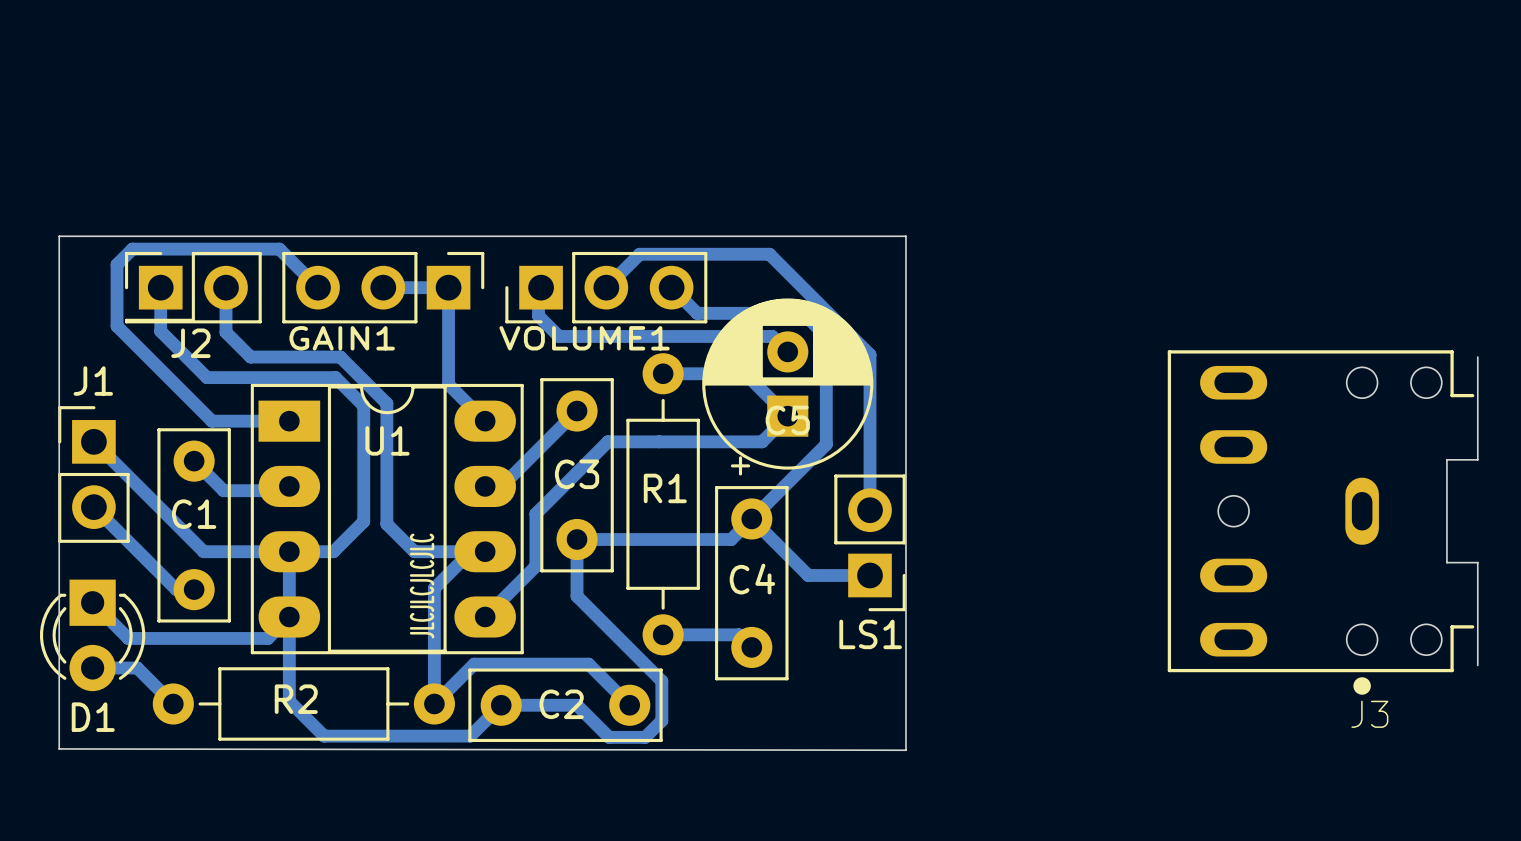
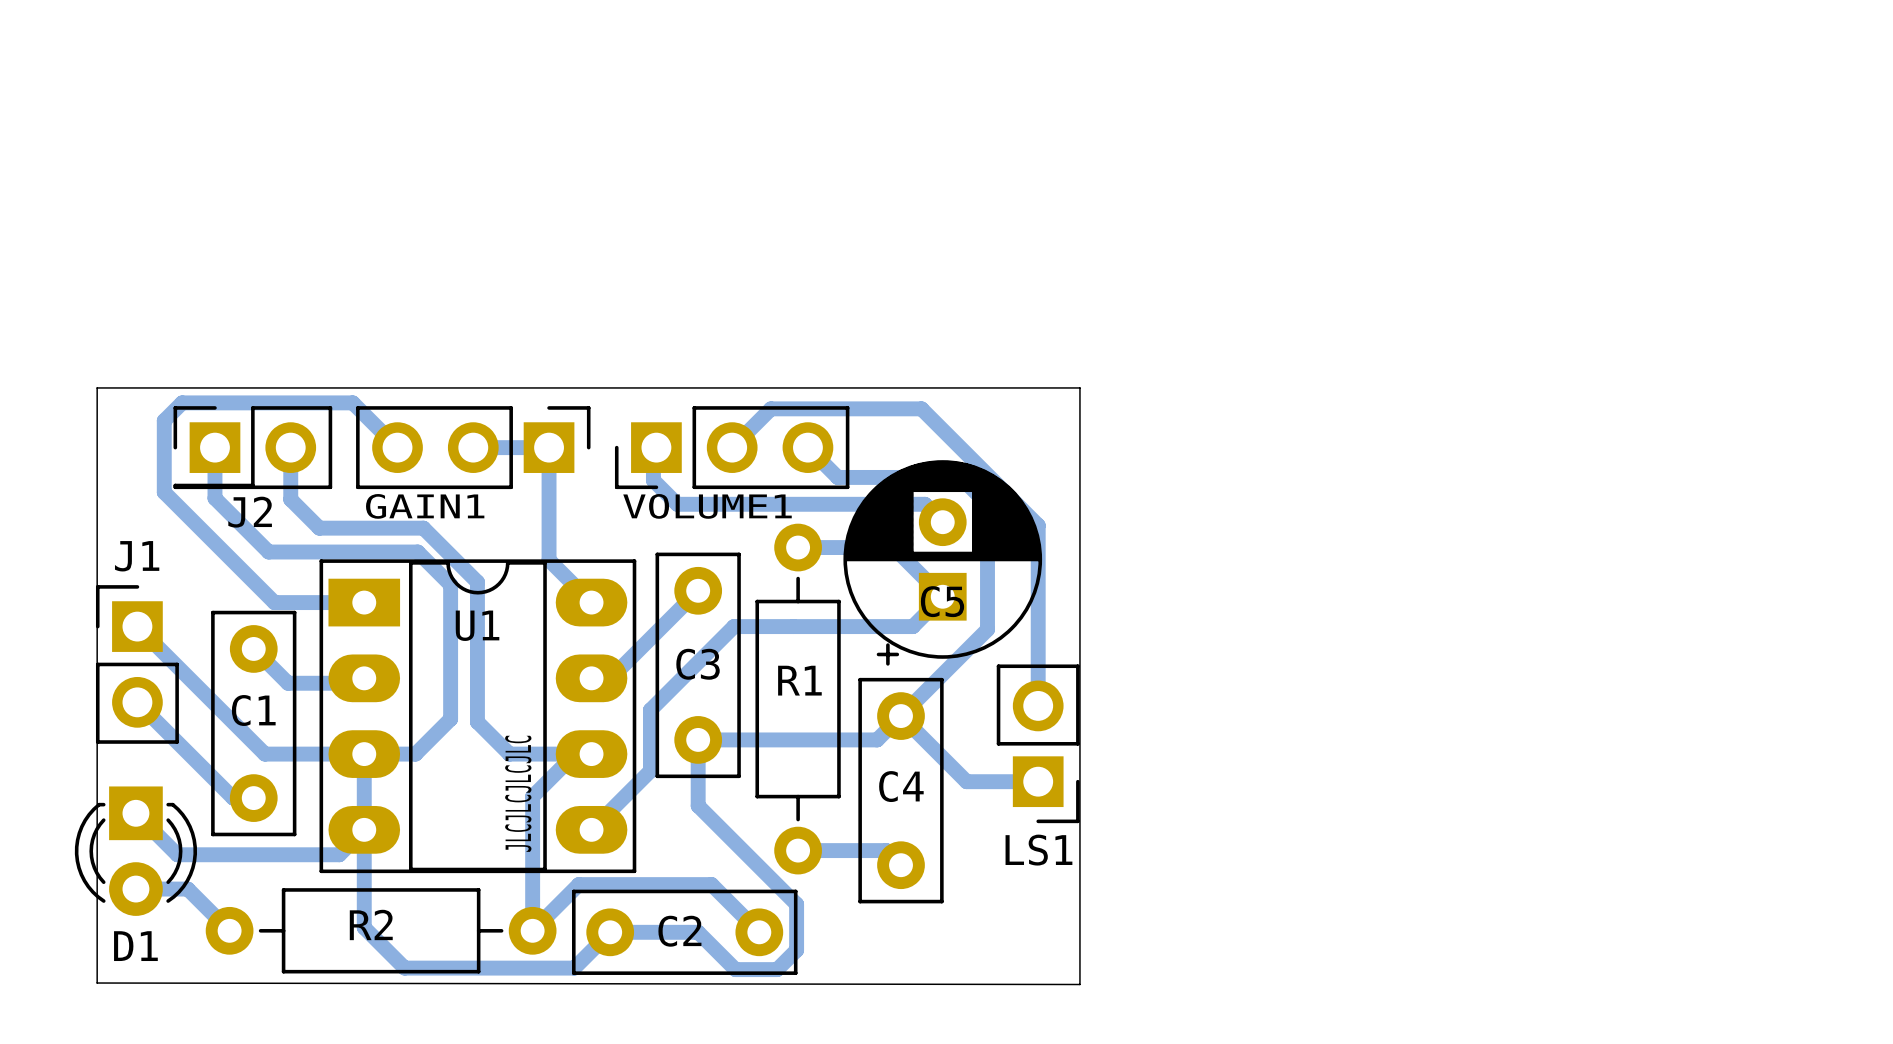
J3: (1322, 522) -> none

